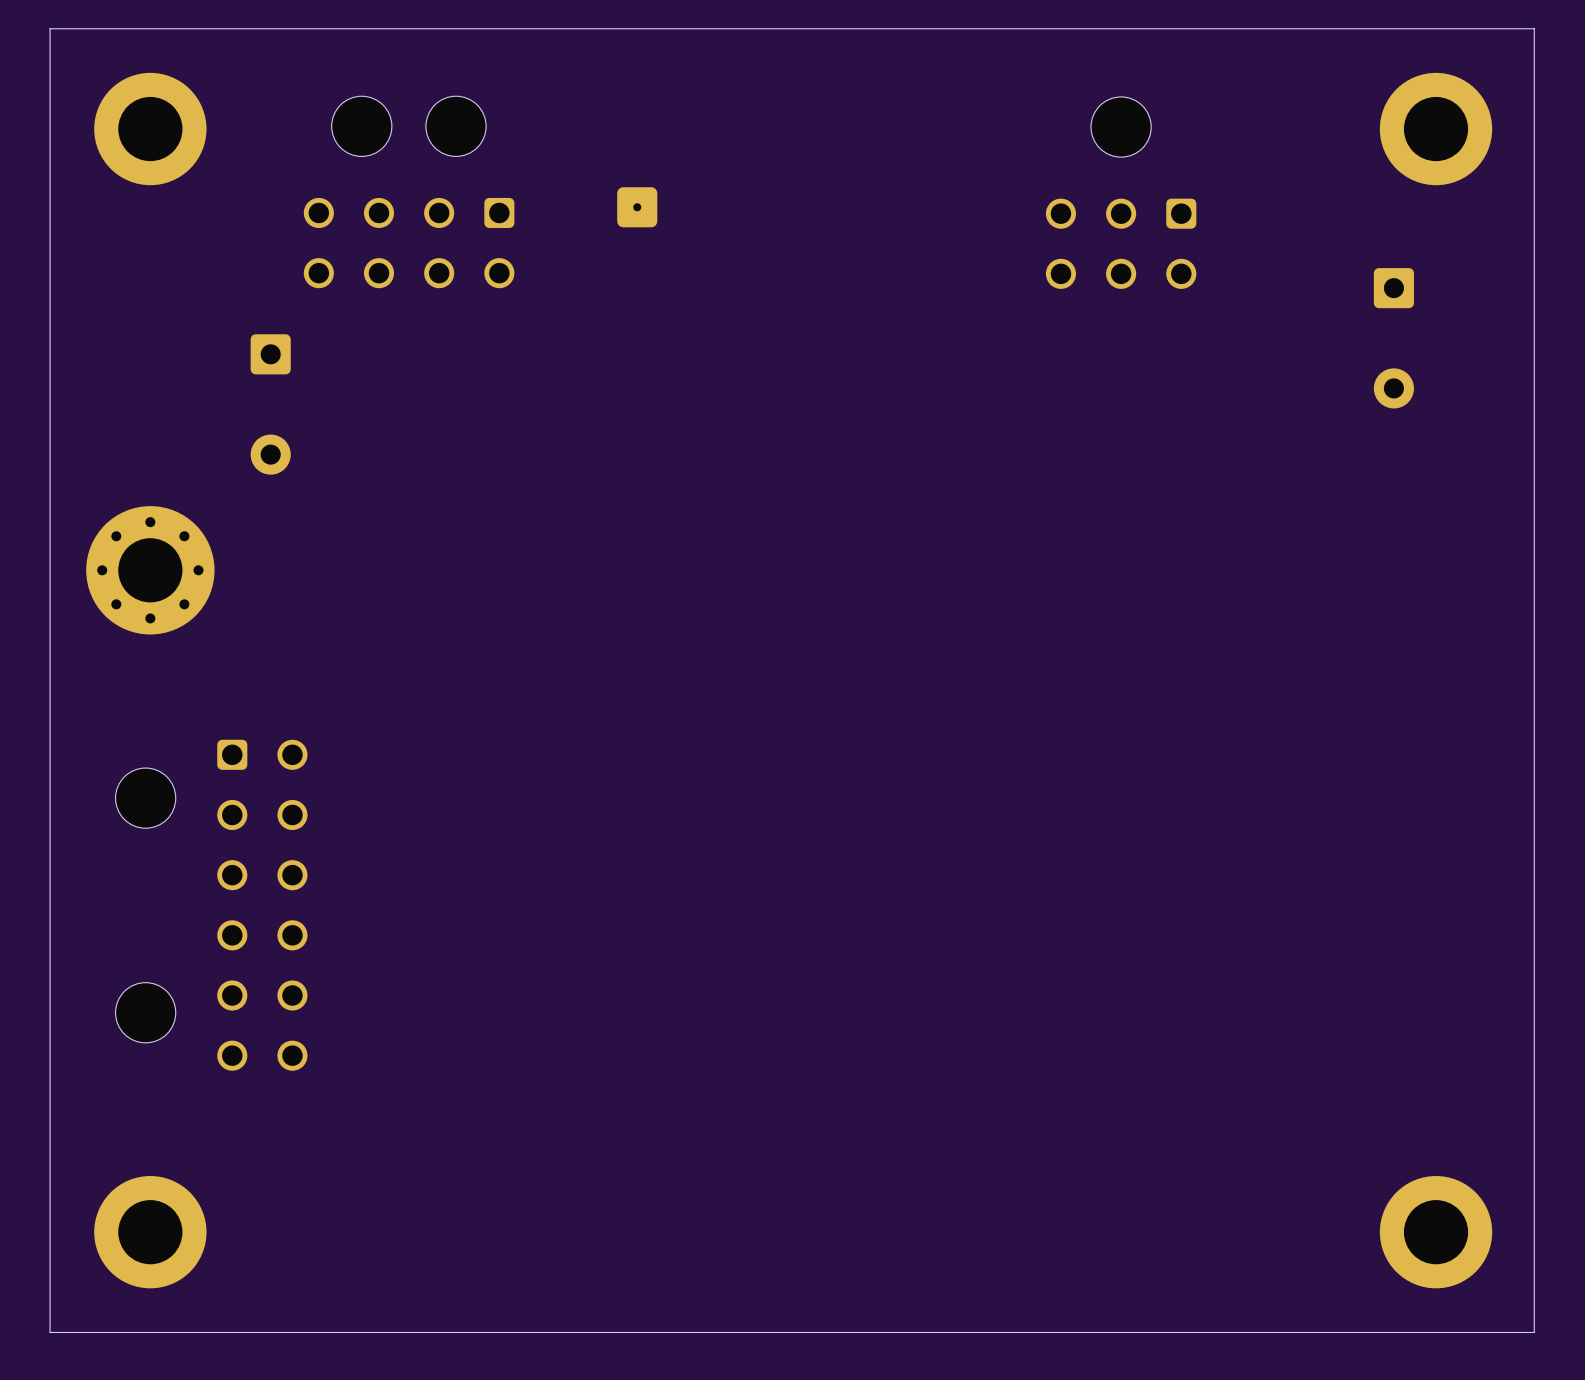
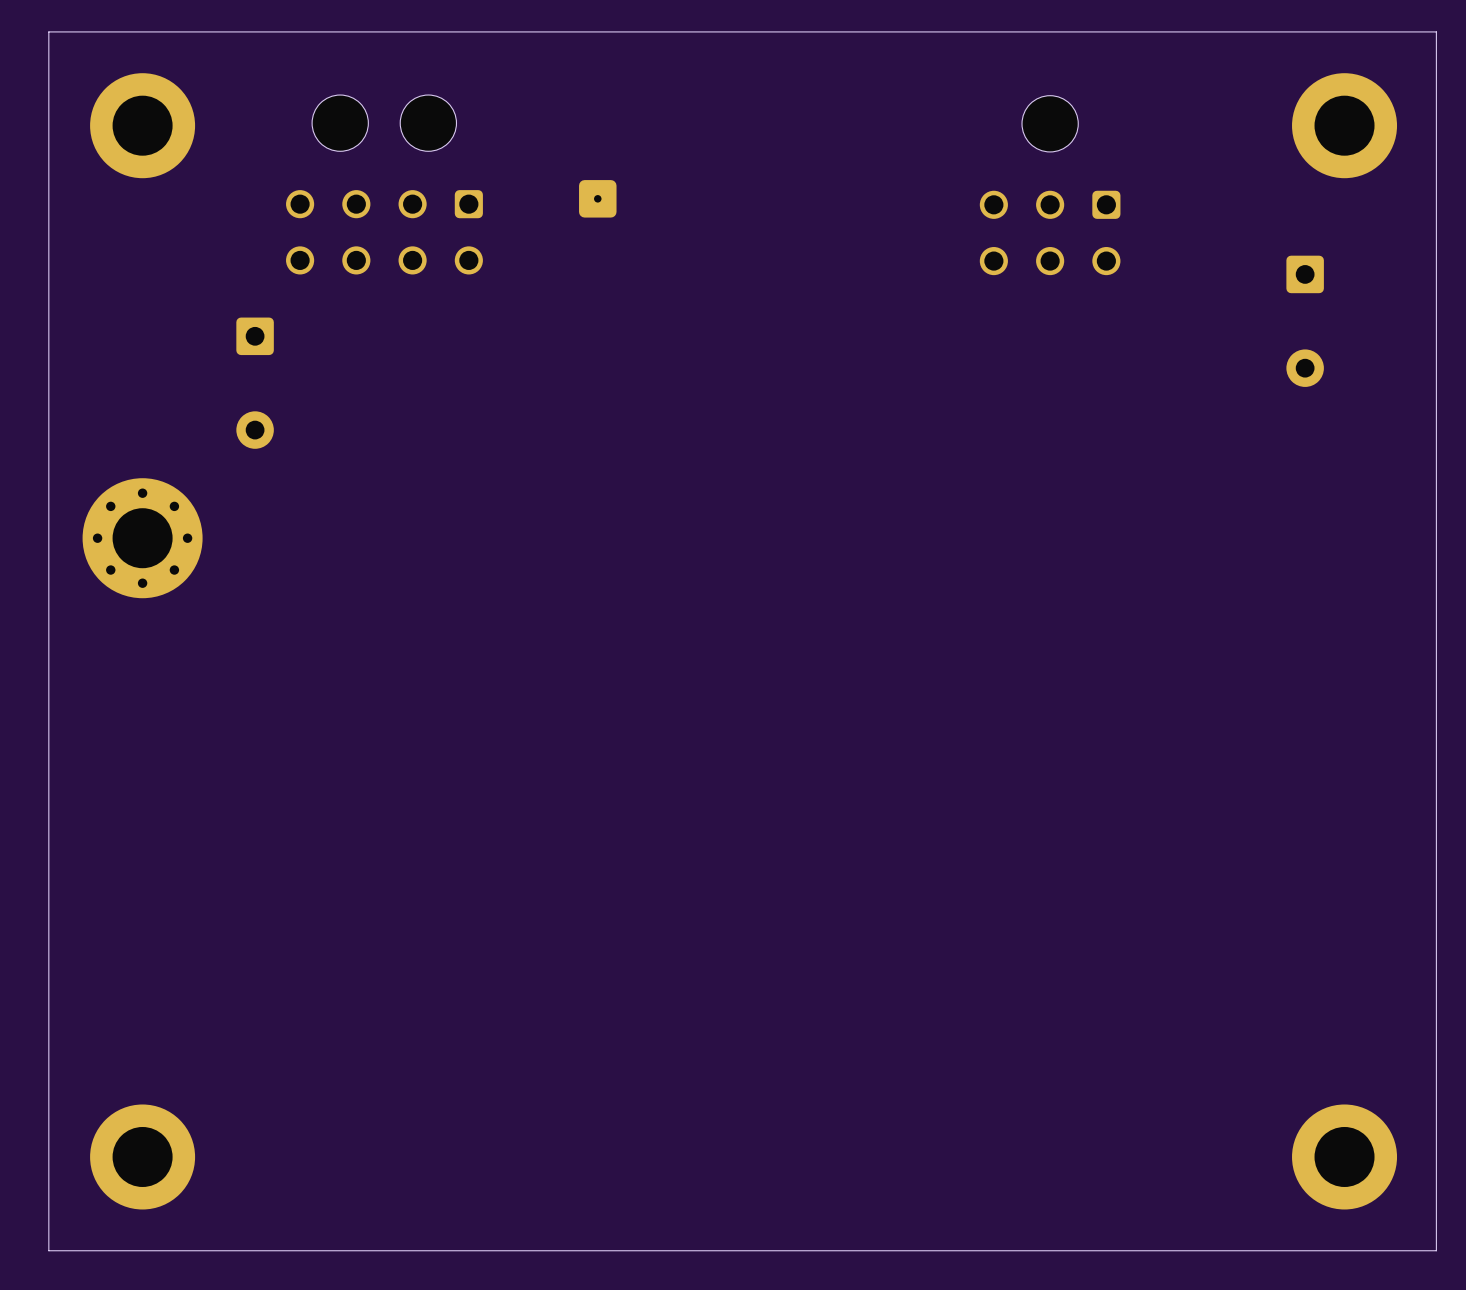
part: (211, 905) -> none

